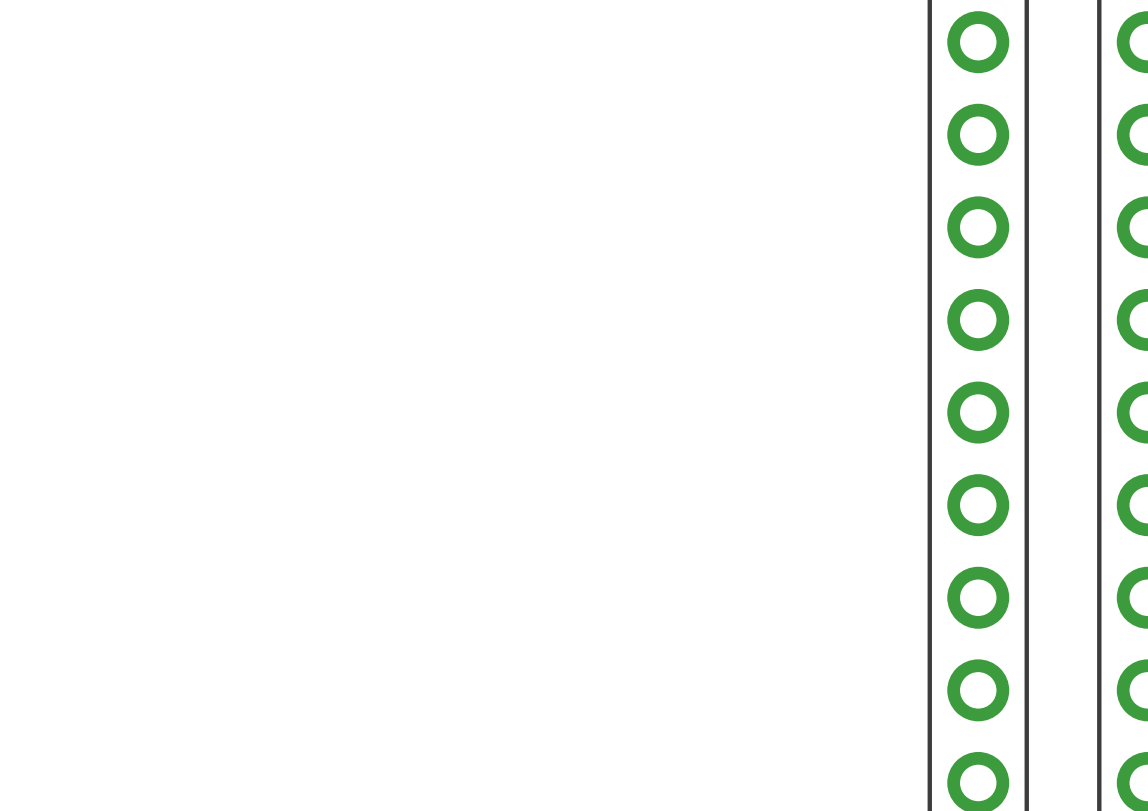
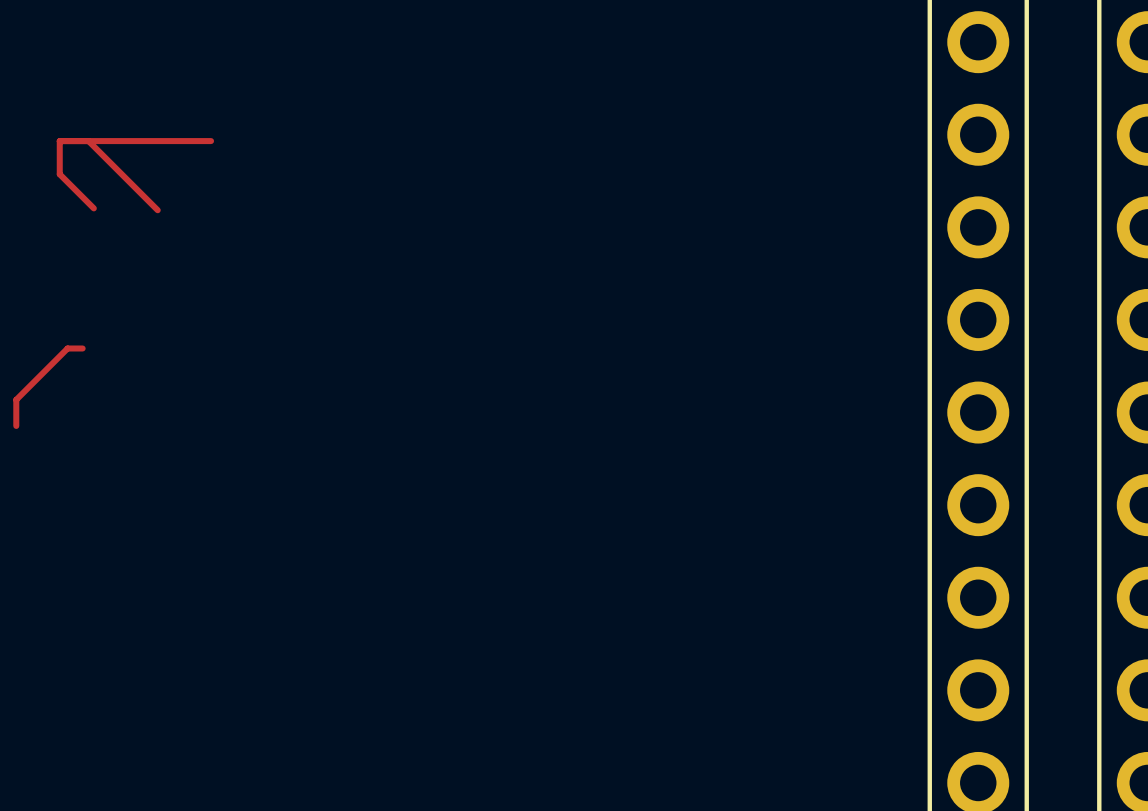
top track: none -> (88, 141) (157, 210)
top track: none -> (211, 141) (59, 141) (59, 174) (93, 208)
top track: none -> (82, 348) (67, 348) (16, 399) (16, 425)

